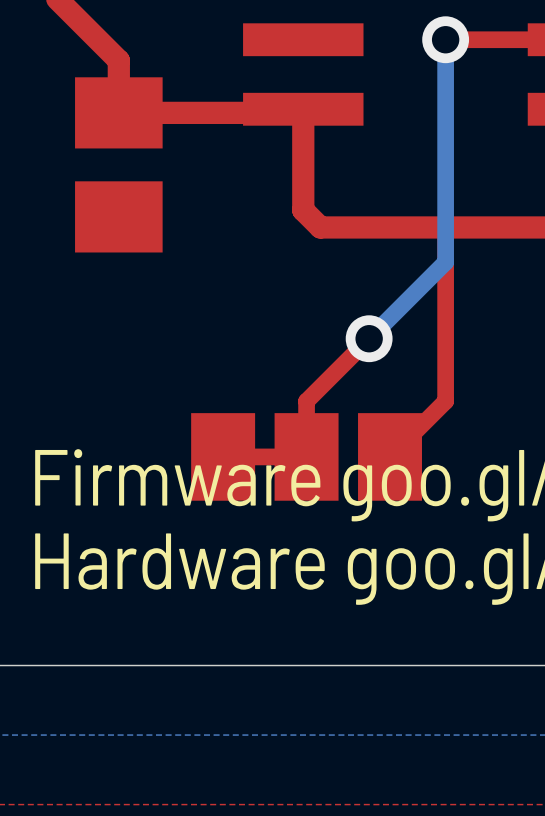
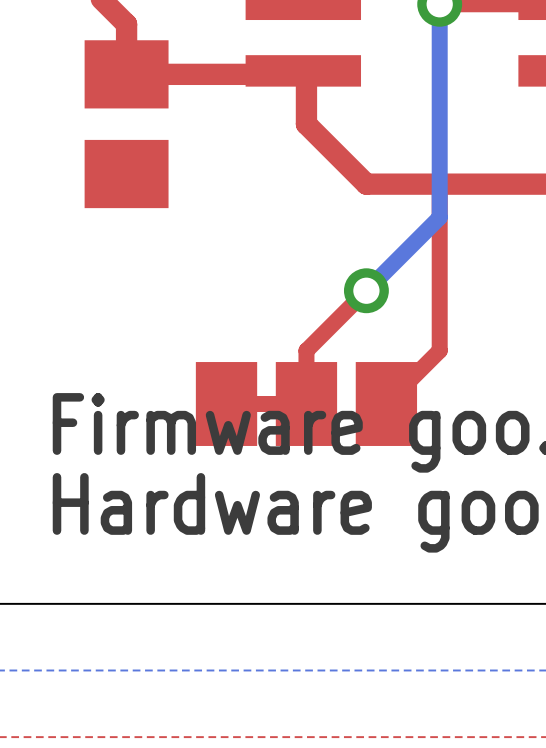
top track: (303, 109) (303, 210) (320, 227) (369, 227) -> (303, 70) (306, 74) (306, 124) (366, 184)

